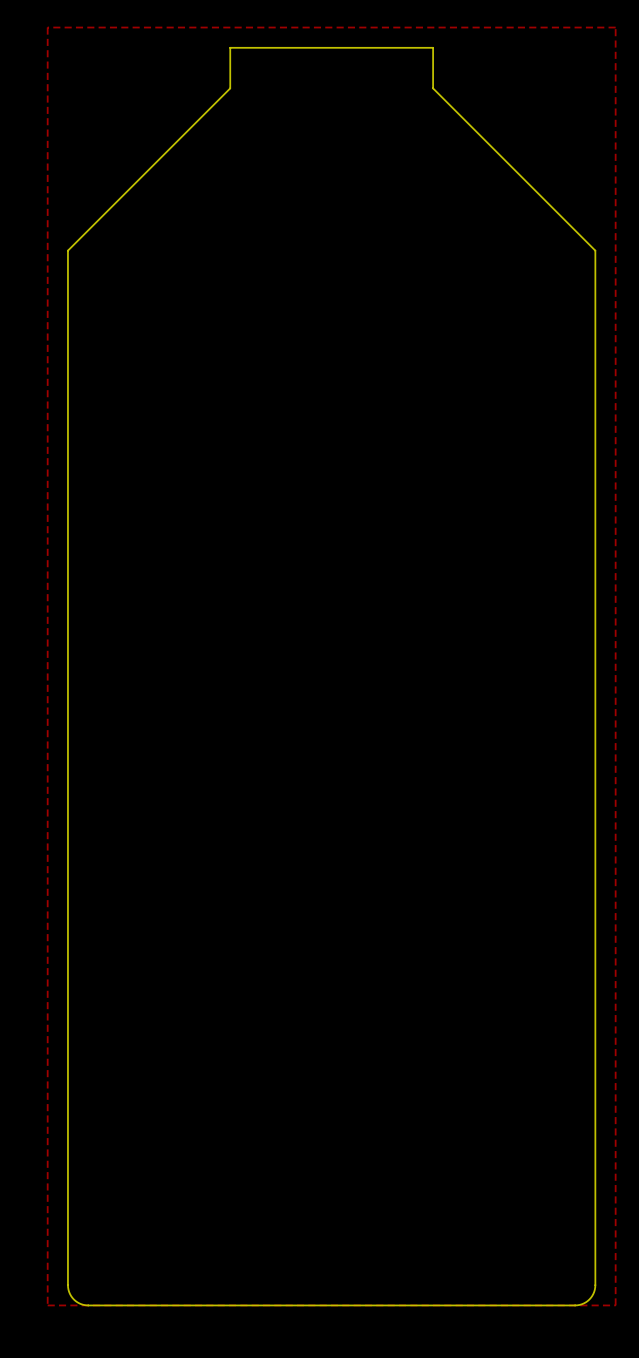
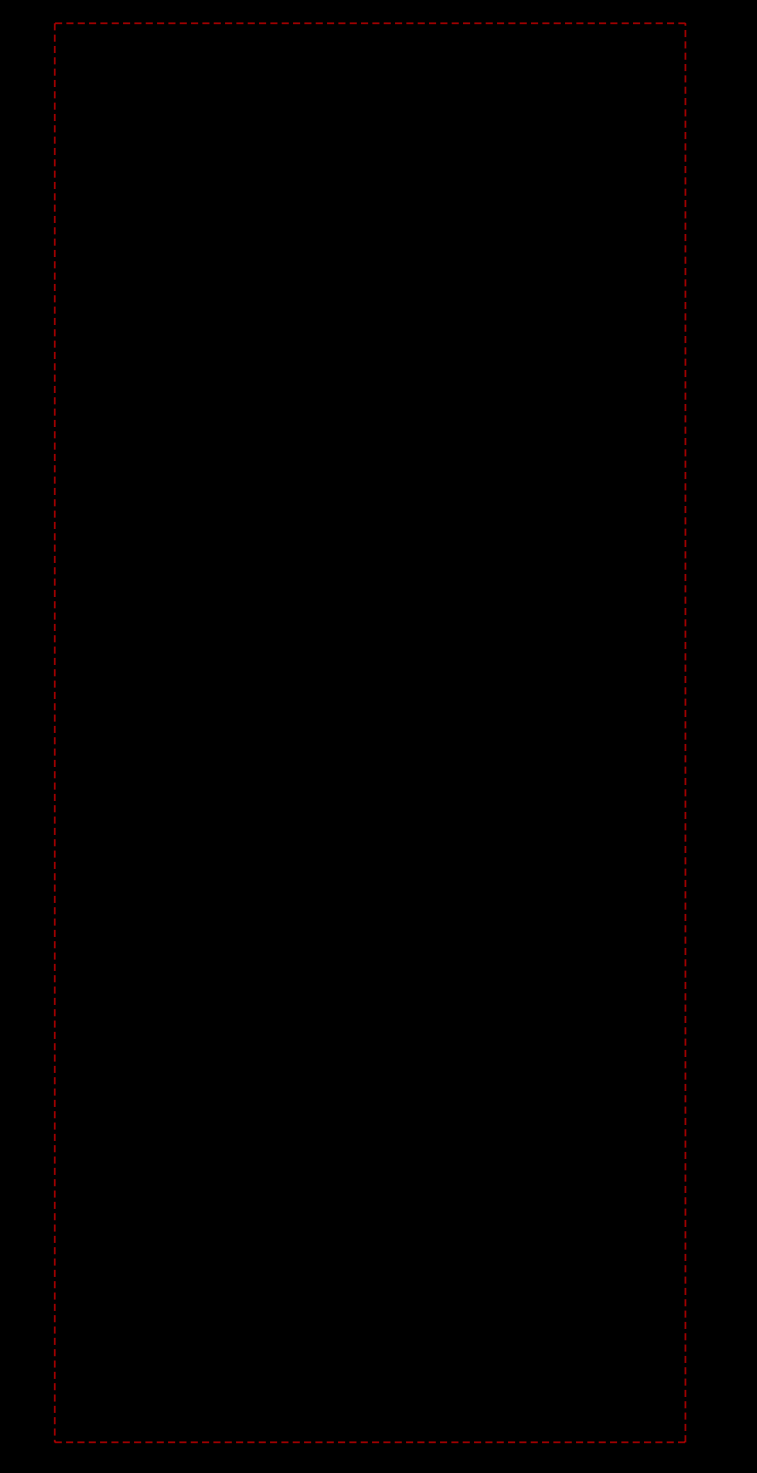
board edge: (230, 47) (230, 88) (67, 250) (68, 1289) (75, 1301) (88, 1305) (579, 1304) (590, 1297) (595, 1285) (595, 250) (433, 88) (433, 47) (230, 47) -> none

